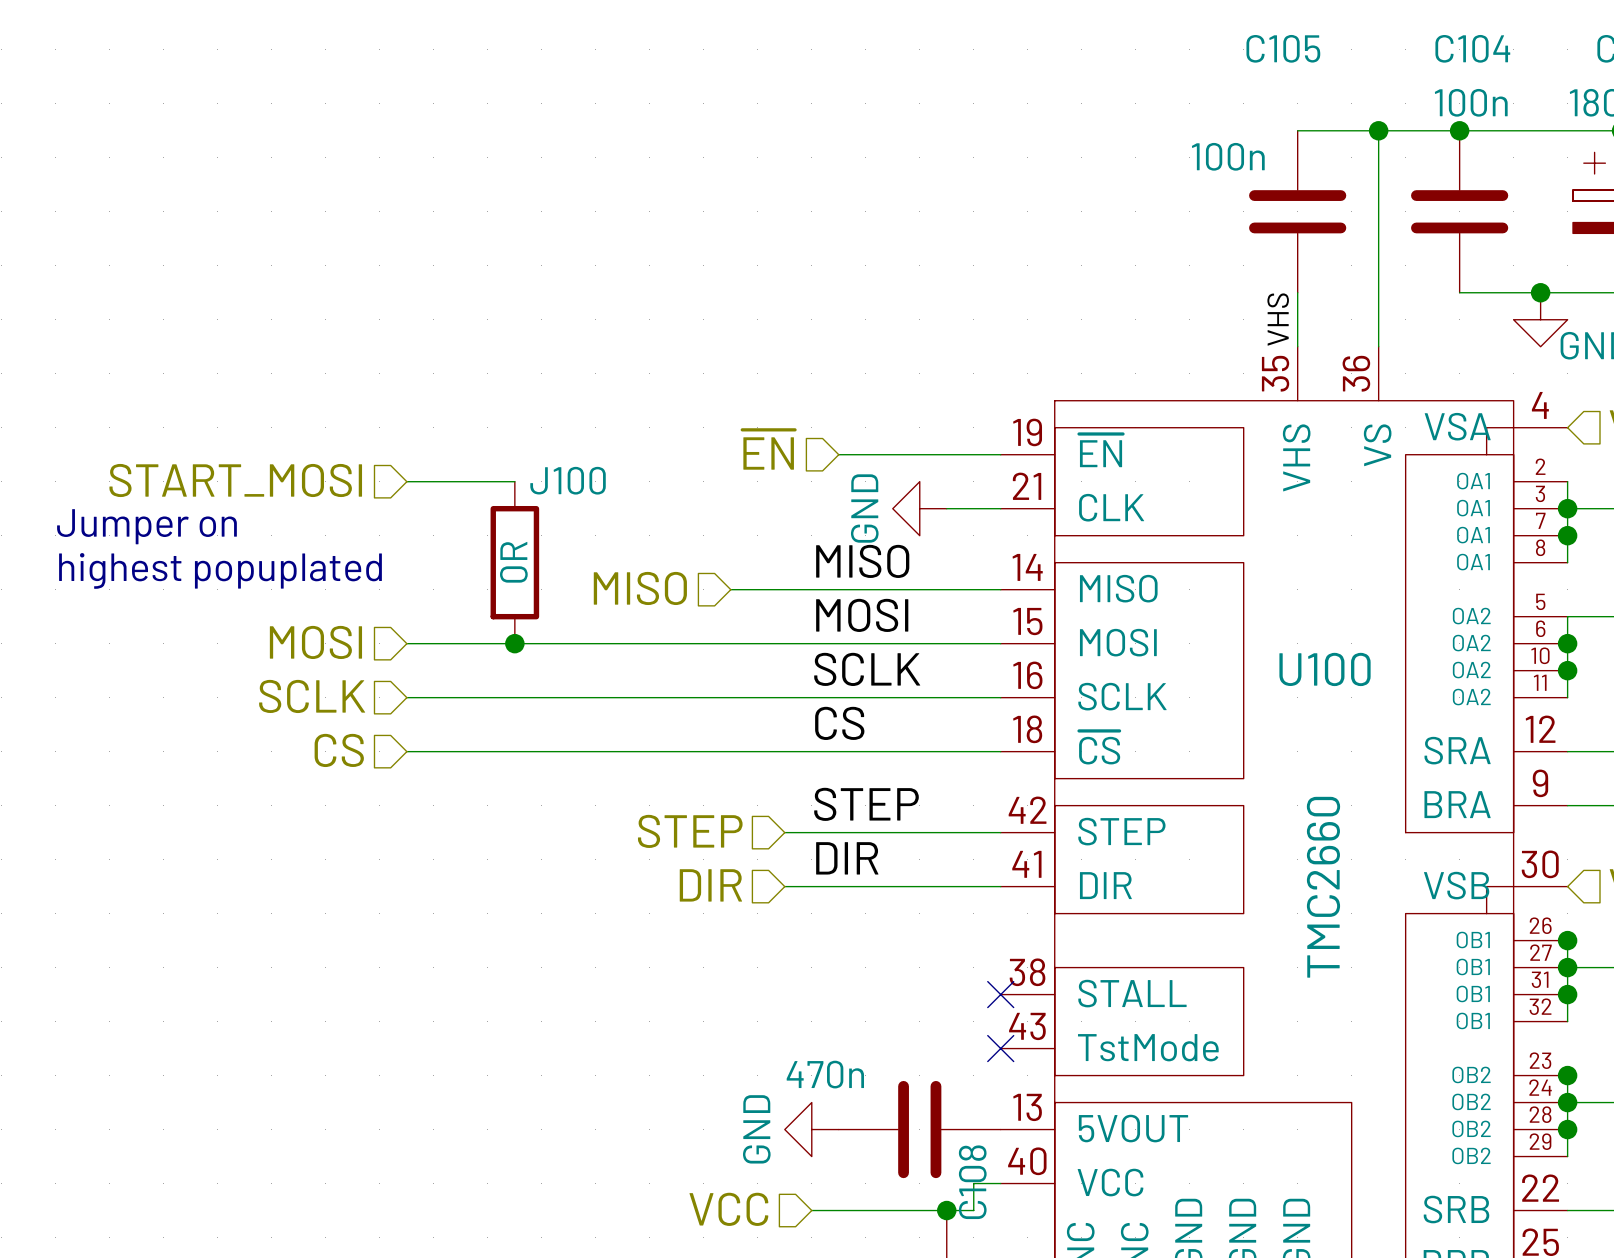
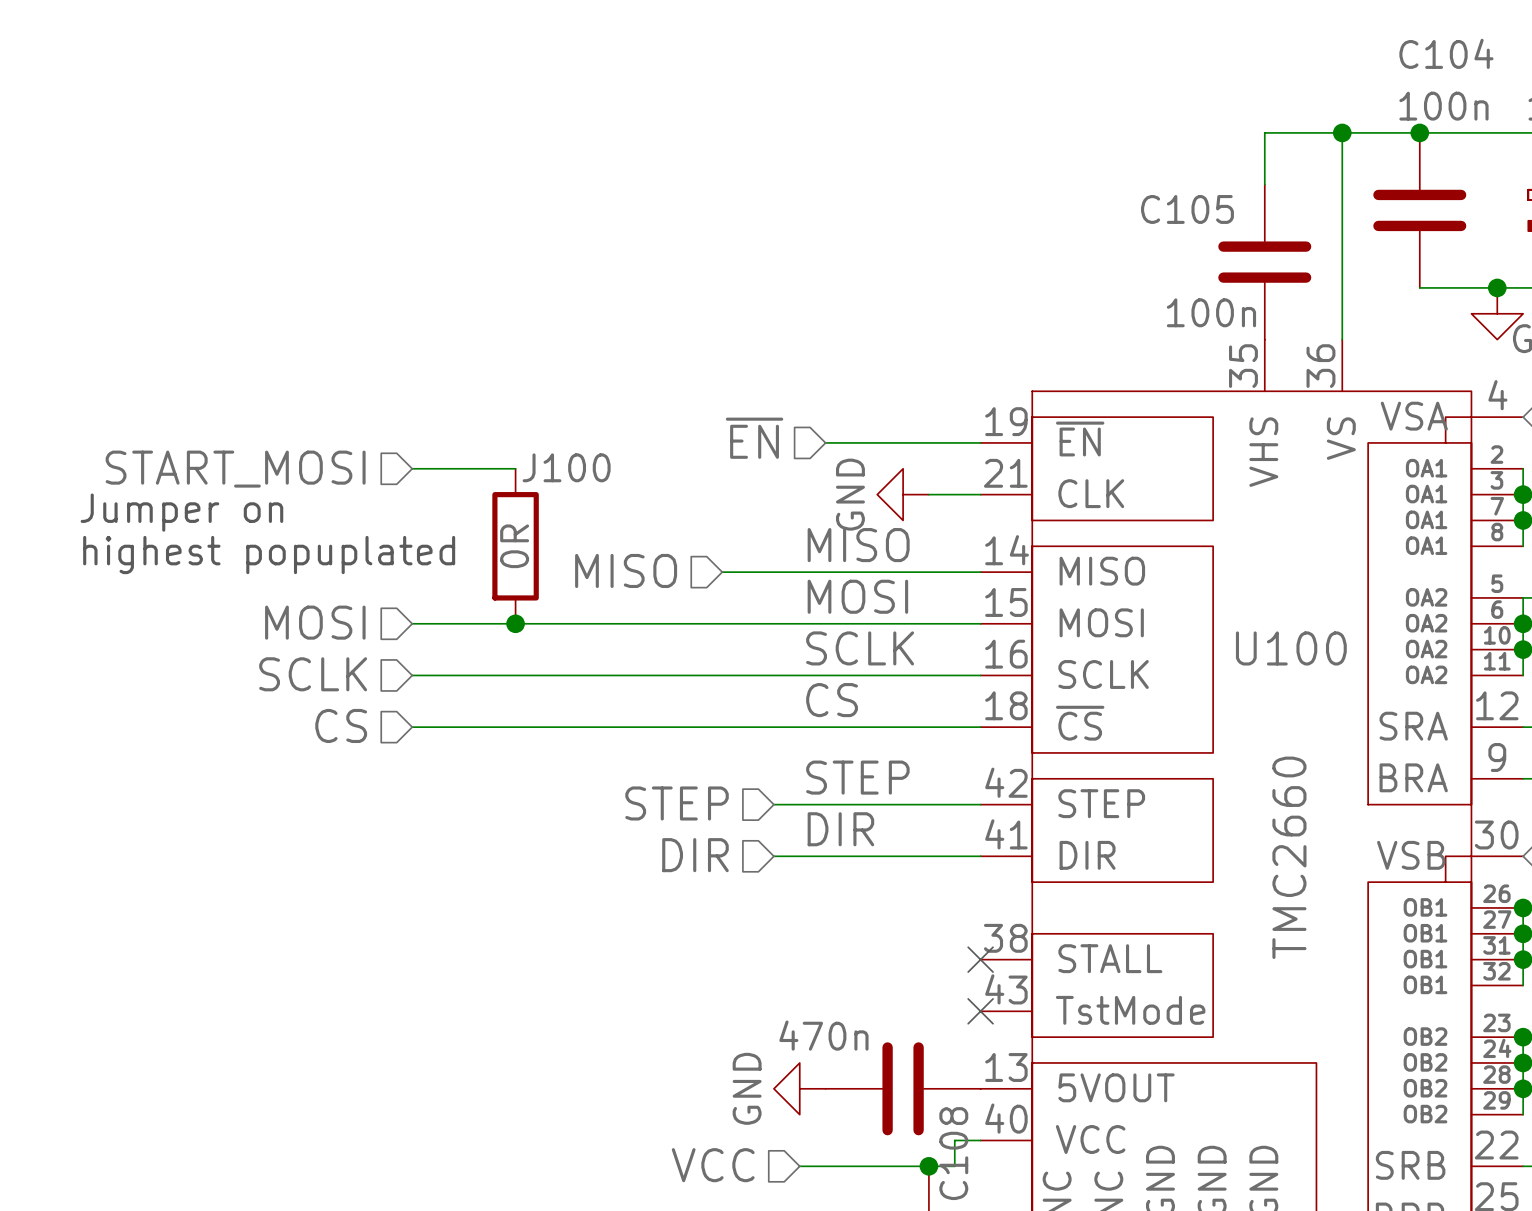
C105 name position: C105 (1283, 48) -> C105 (1187, 209)
C105 value position: 100n (1228, 156) -> 100n (1211, 312)
C105 position: (1297, 211) -> (1264, 262)
label: VHS (1278, 319) -> none

